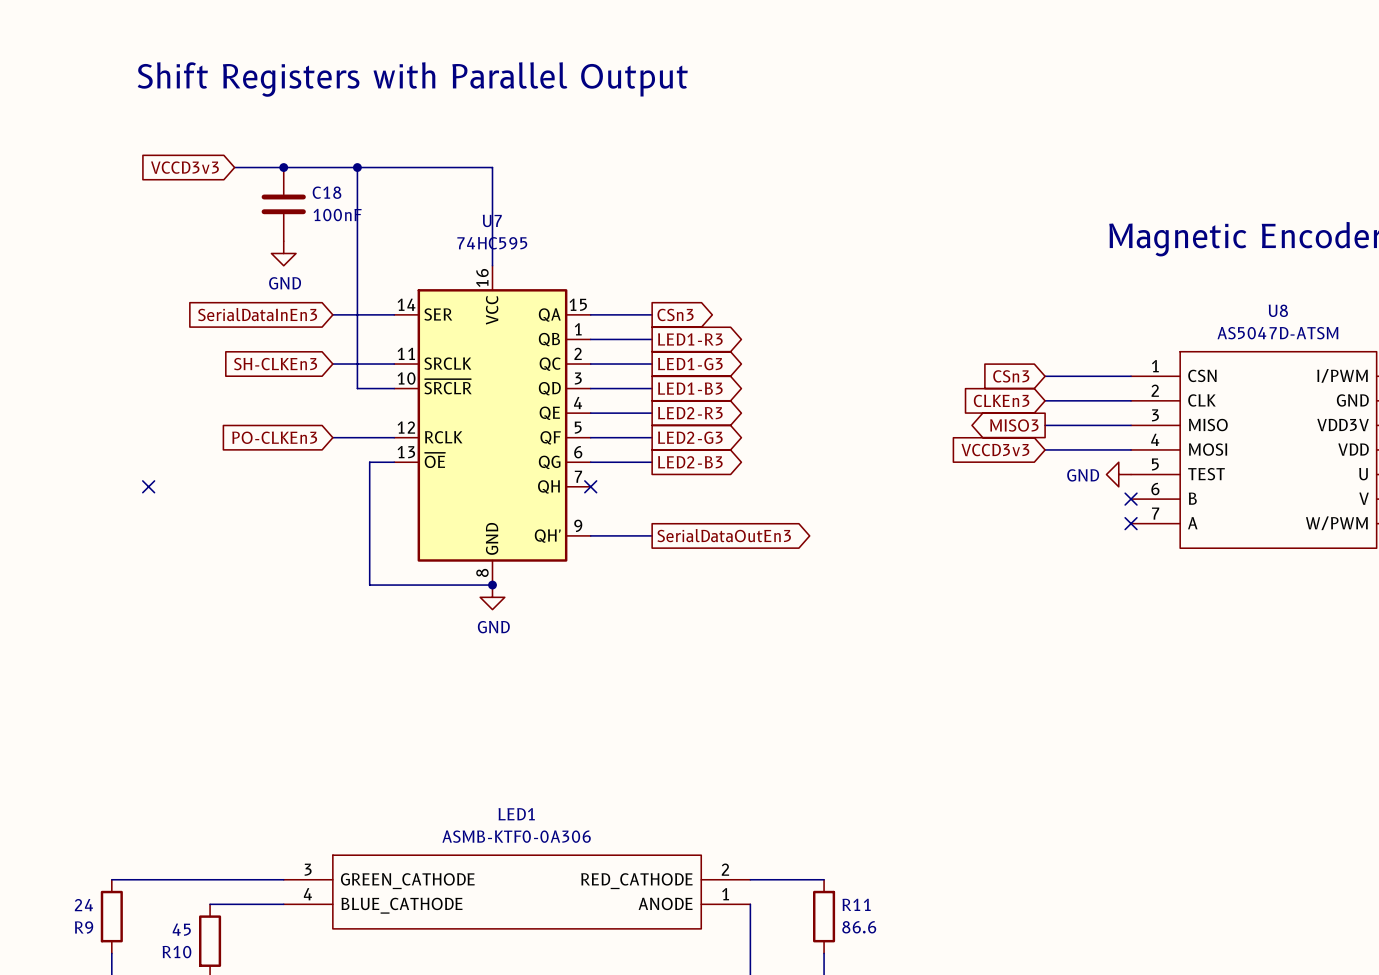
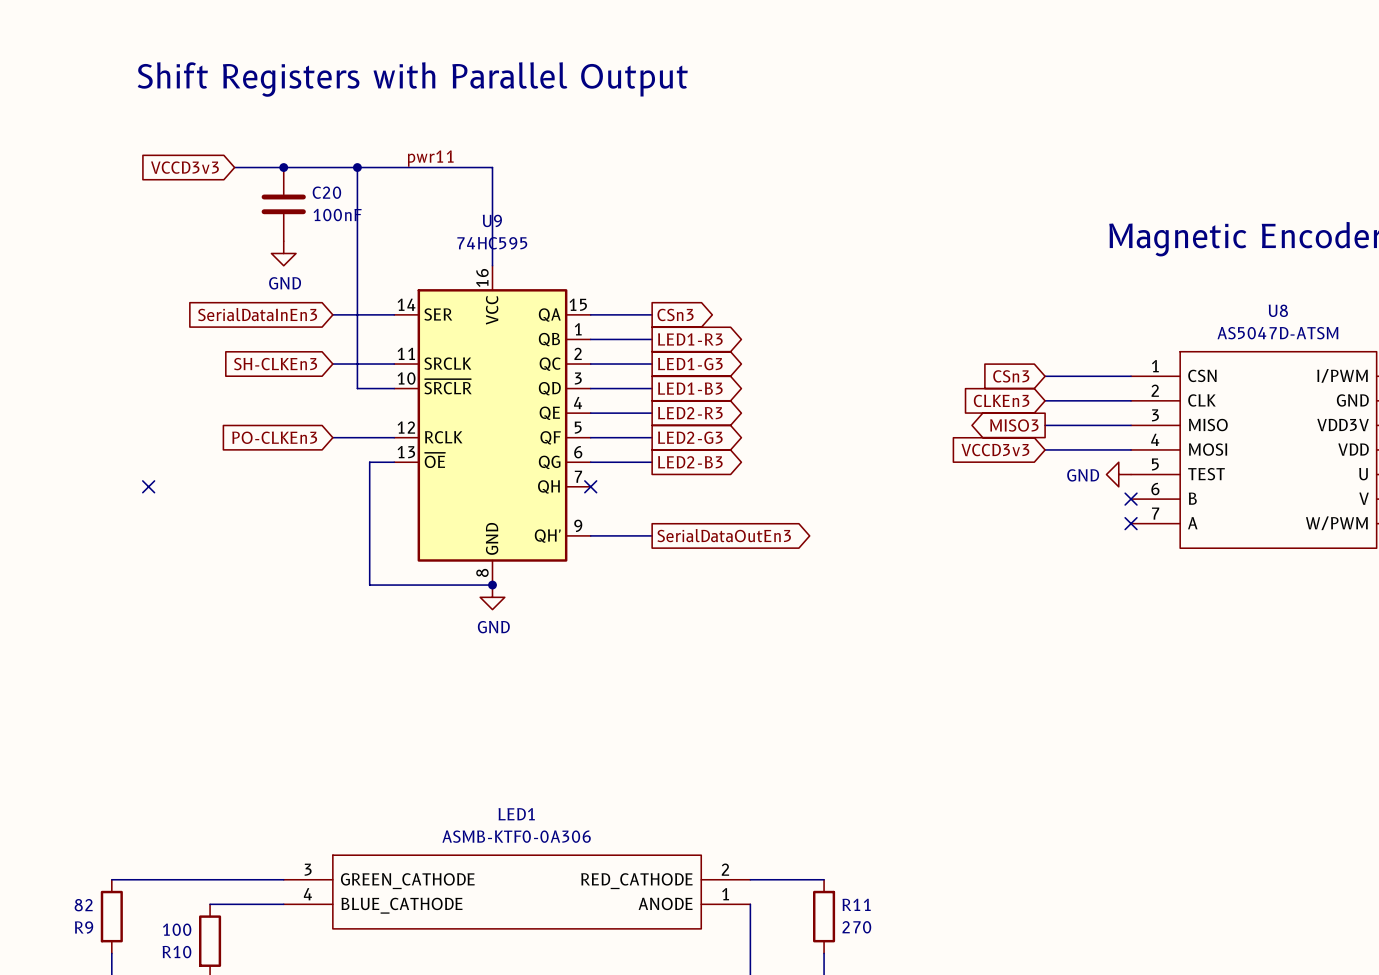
label: none -> pwr11 (430, 158)
C18 name: C18 (327, 192) -> C20 (326, 192)
U7 name: U7 (492, 220) -> U9 (492, 220)
R9 value: 24 (83, 905) -> 82 (83, 905)
R11 value: 86.6 (859, 927) -> 270 (856, 927)
R10 value: 45 (181, 929) -> 100 (177, 929)

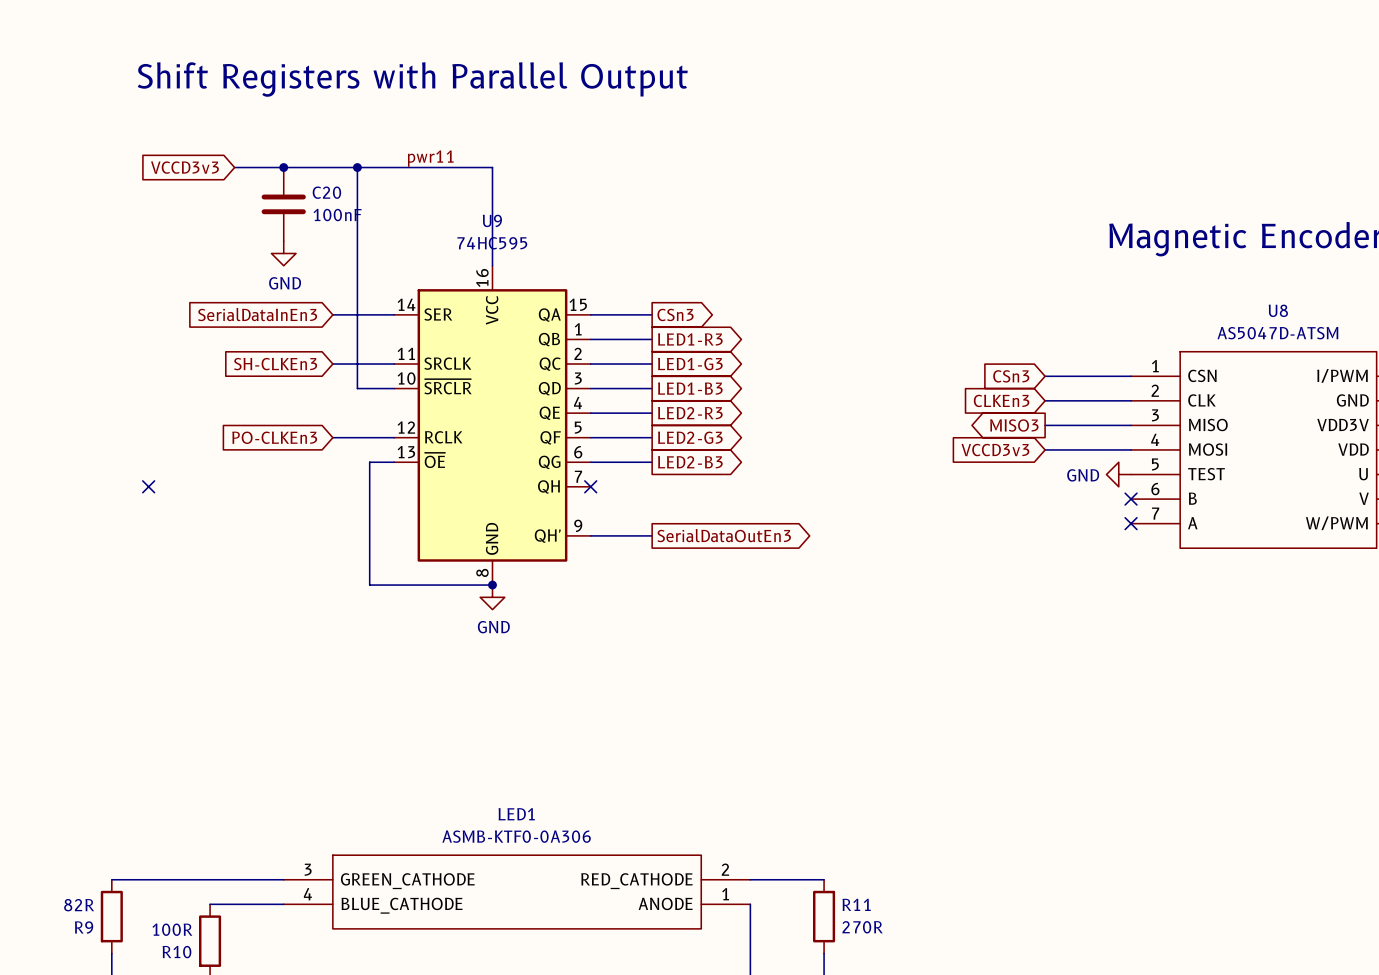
R9 value: 82 (83, 905) -> 82R (79, 905)
R11 value: 270 (856, 927) -> 270R (862, 927)
R10 value: 100 (177, 929) -> 100R (172, 929)

